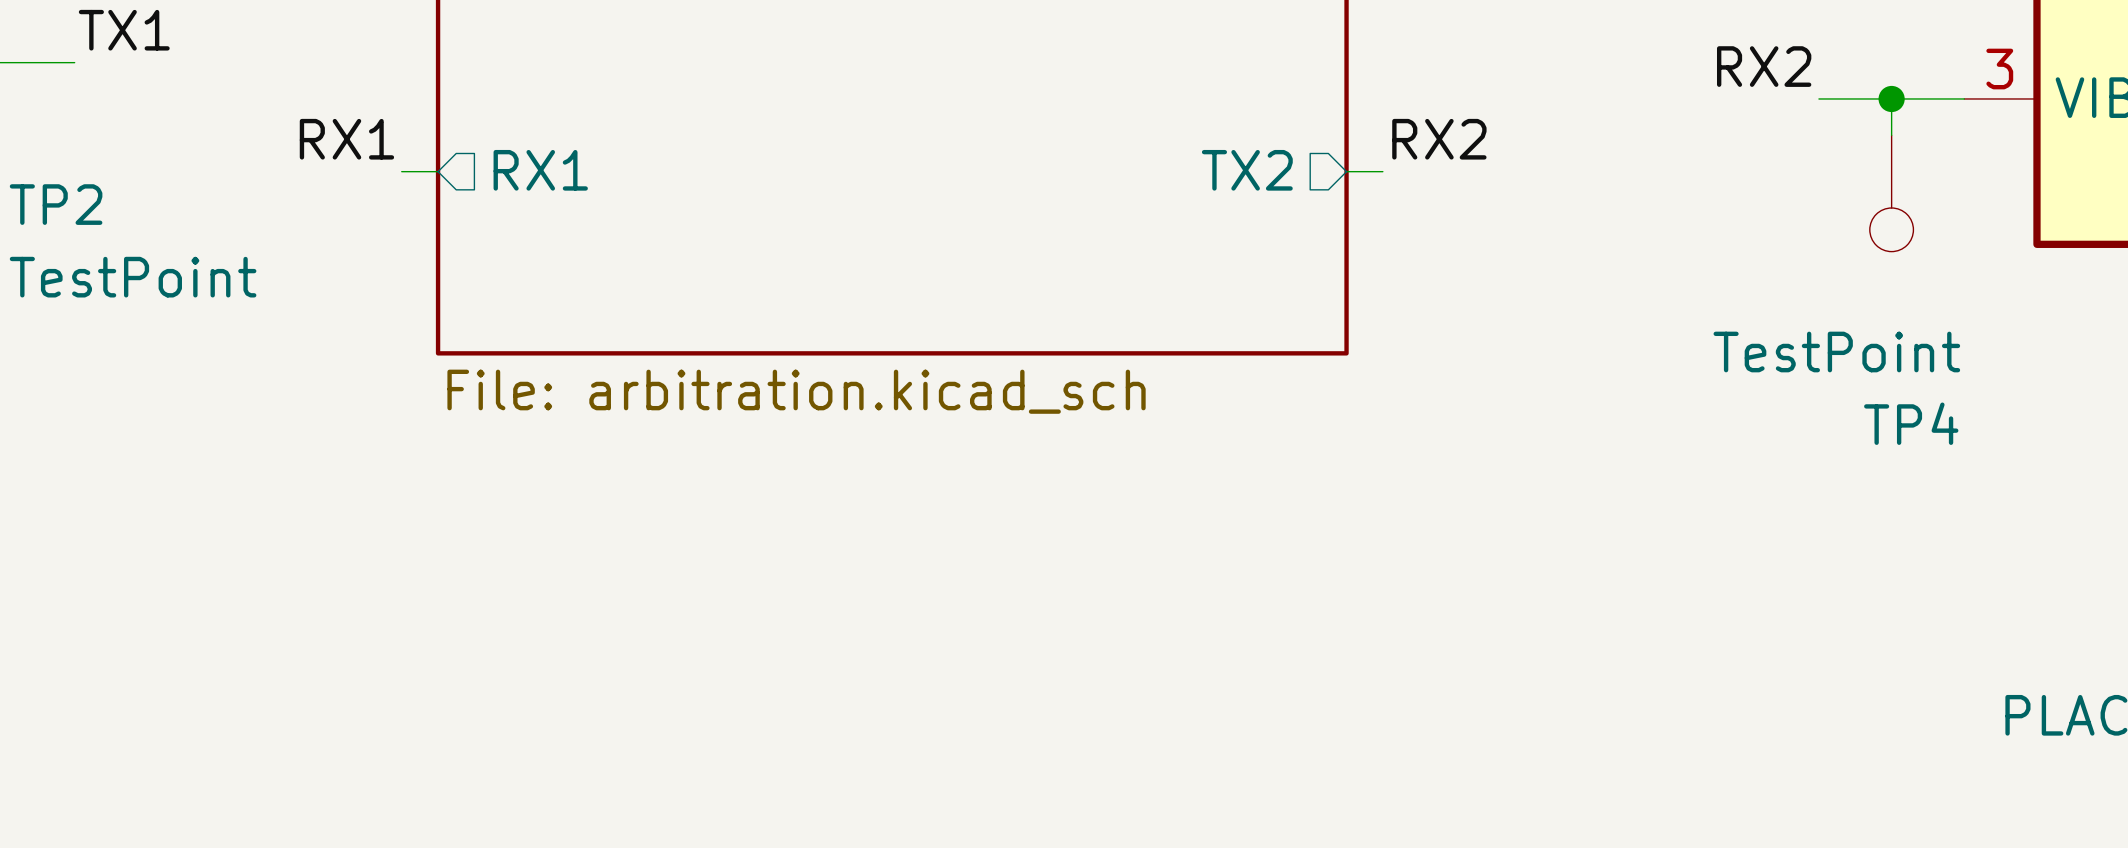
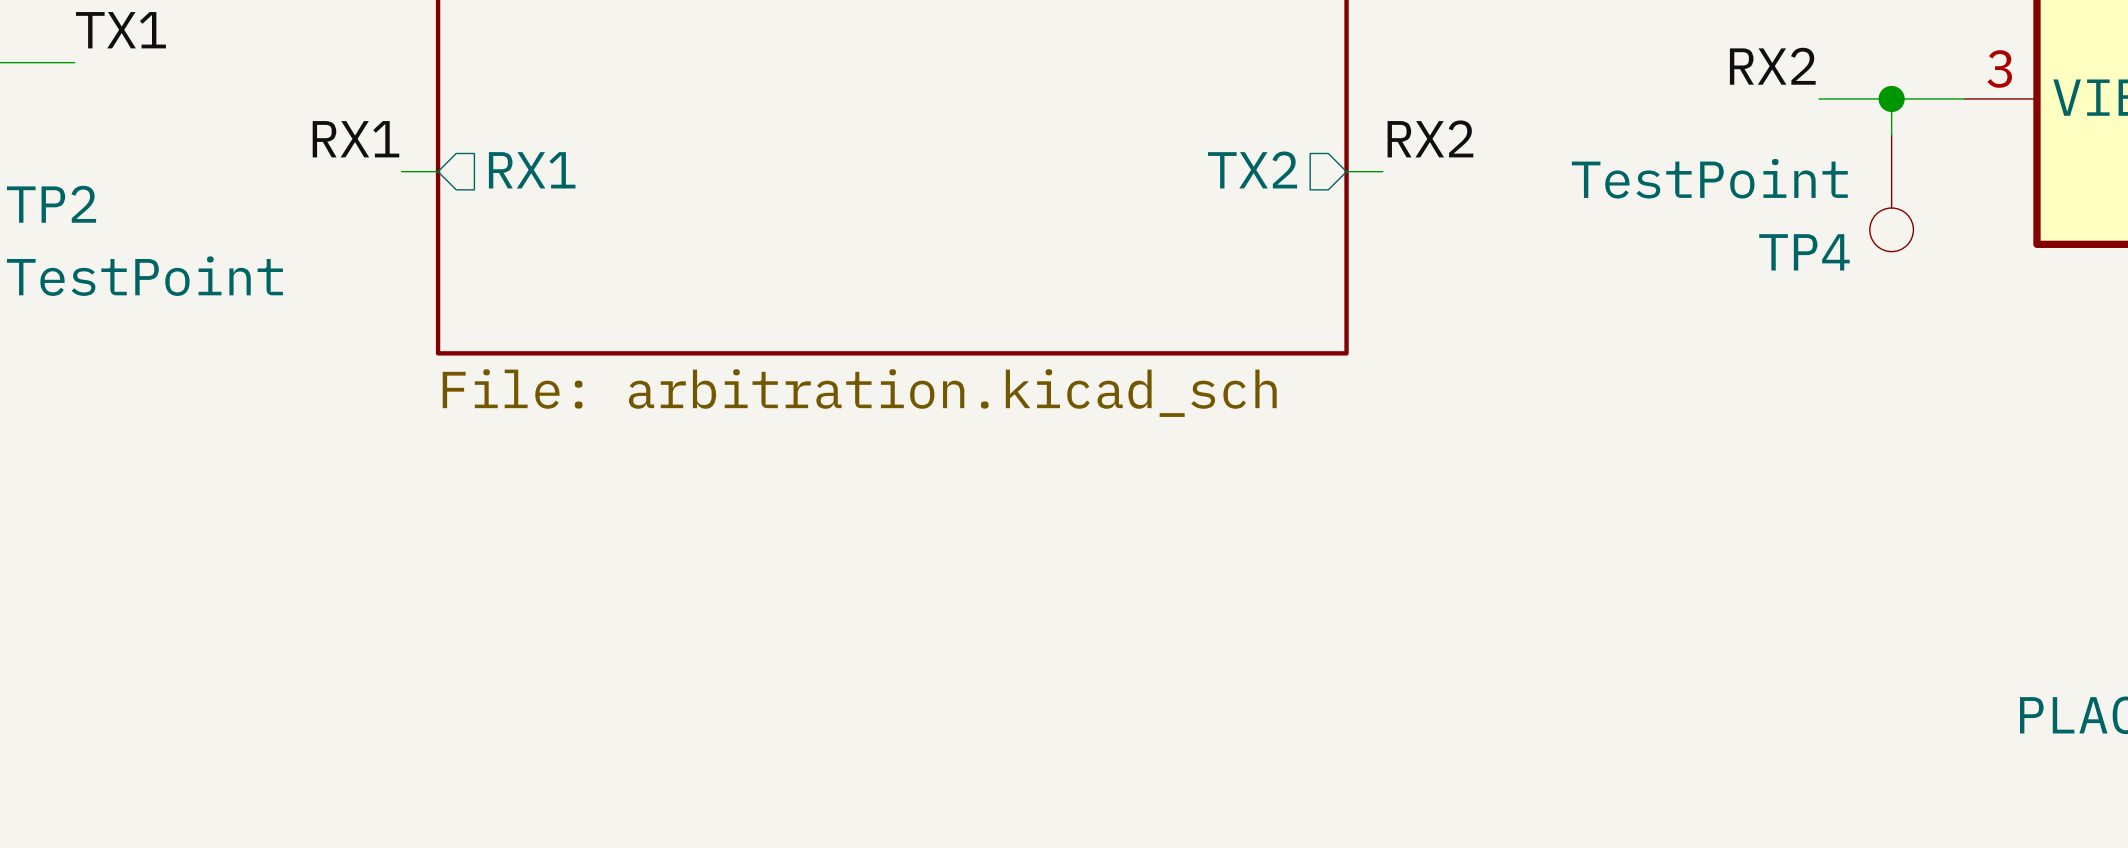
TP4 value position: TestPoint (1836, 352) -> TestPoint (1709, 178)
TP4 name position: TP4 (1911, 423) -> TP4 (1804, 252)

